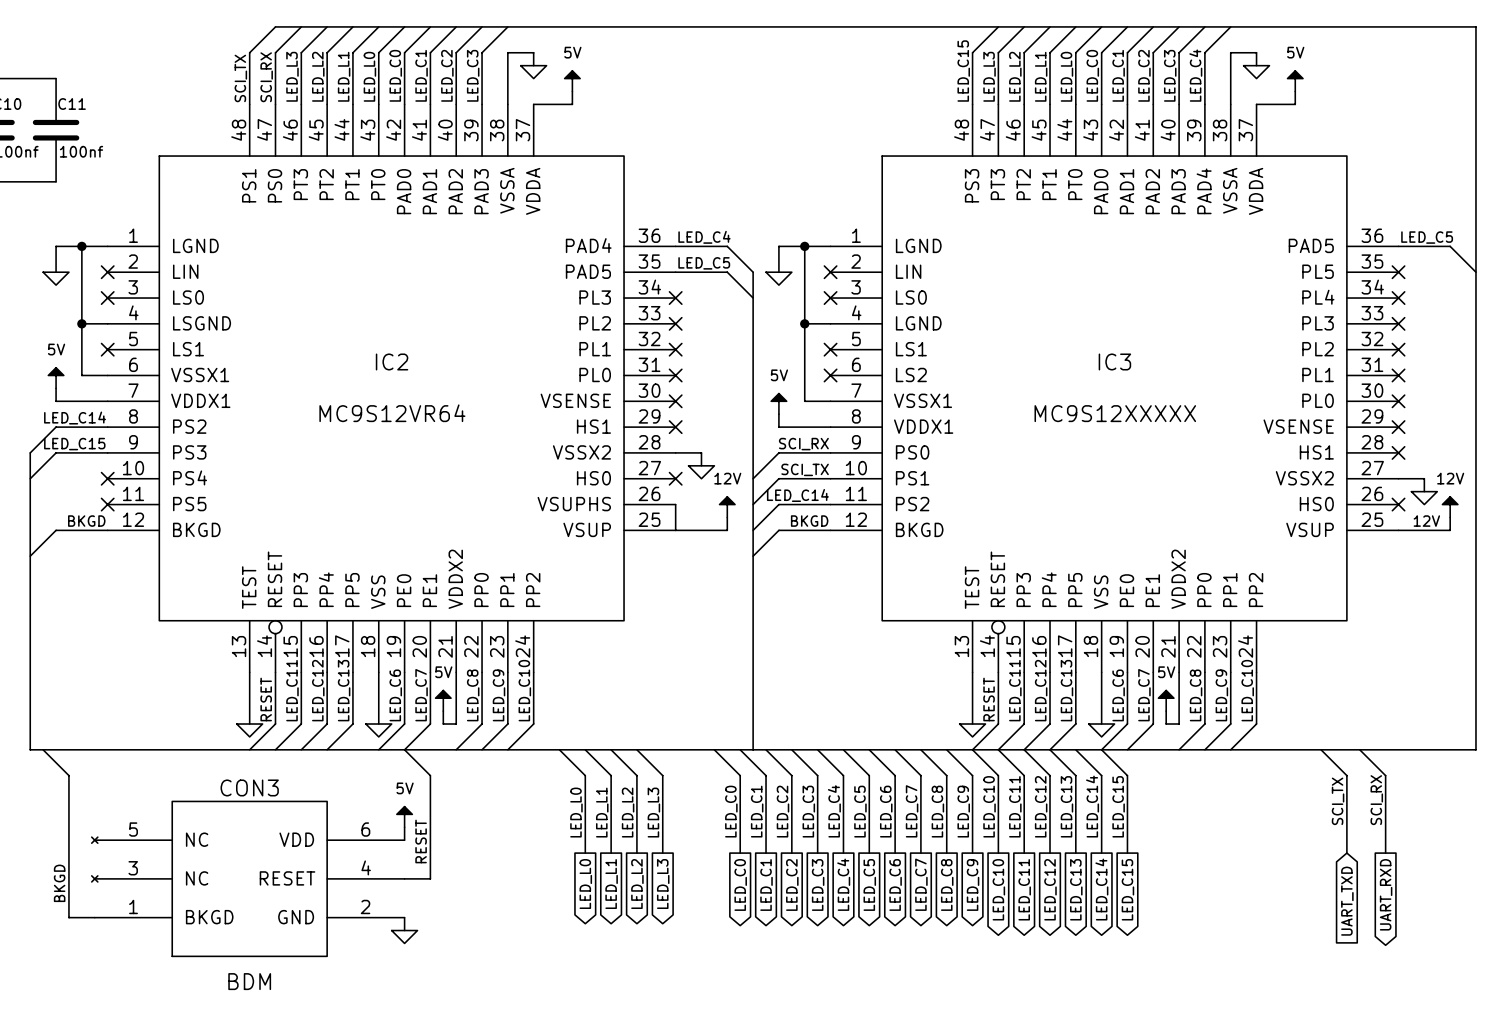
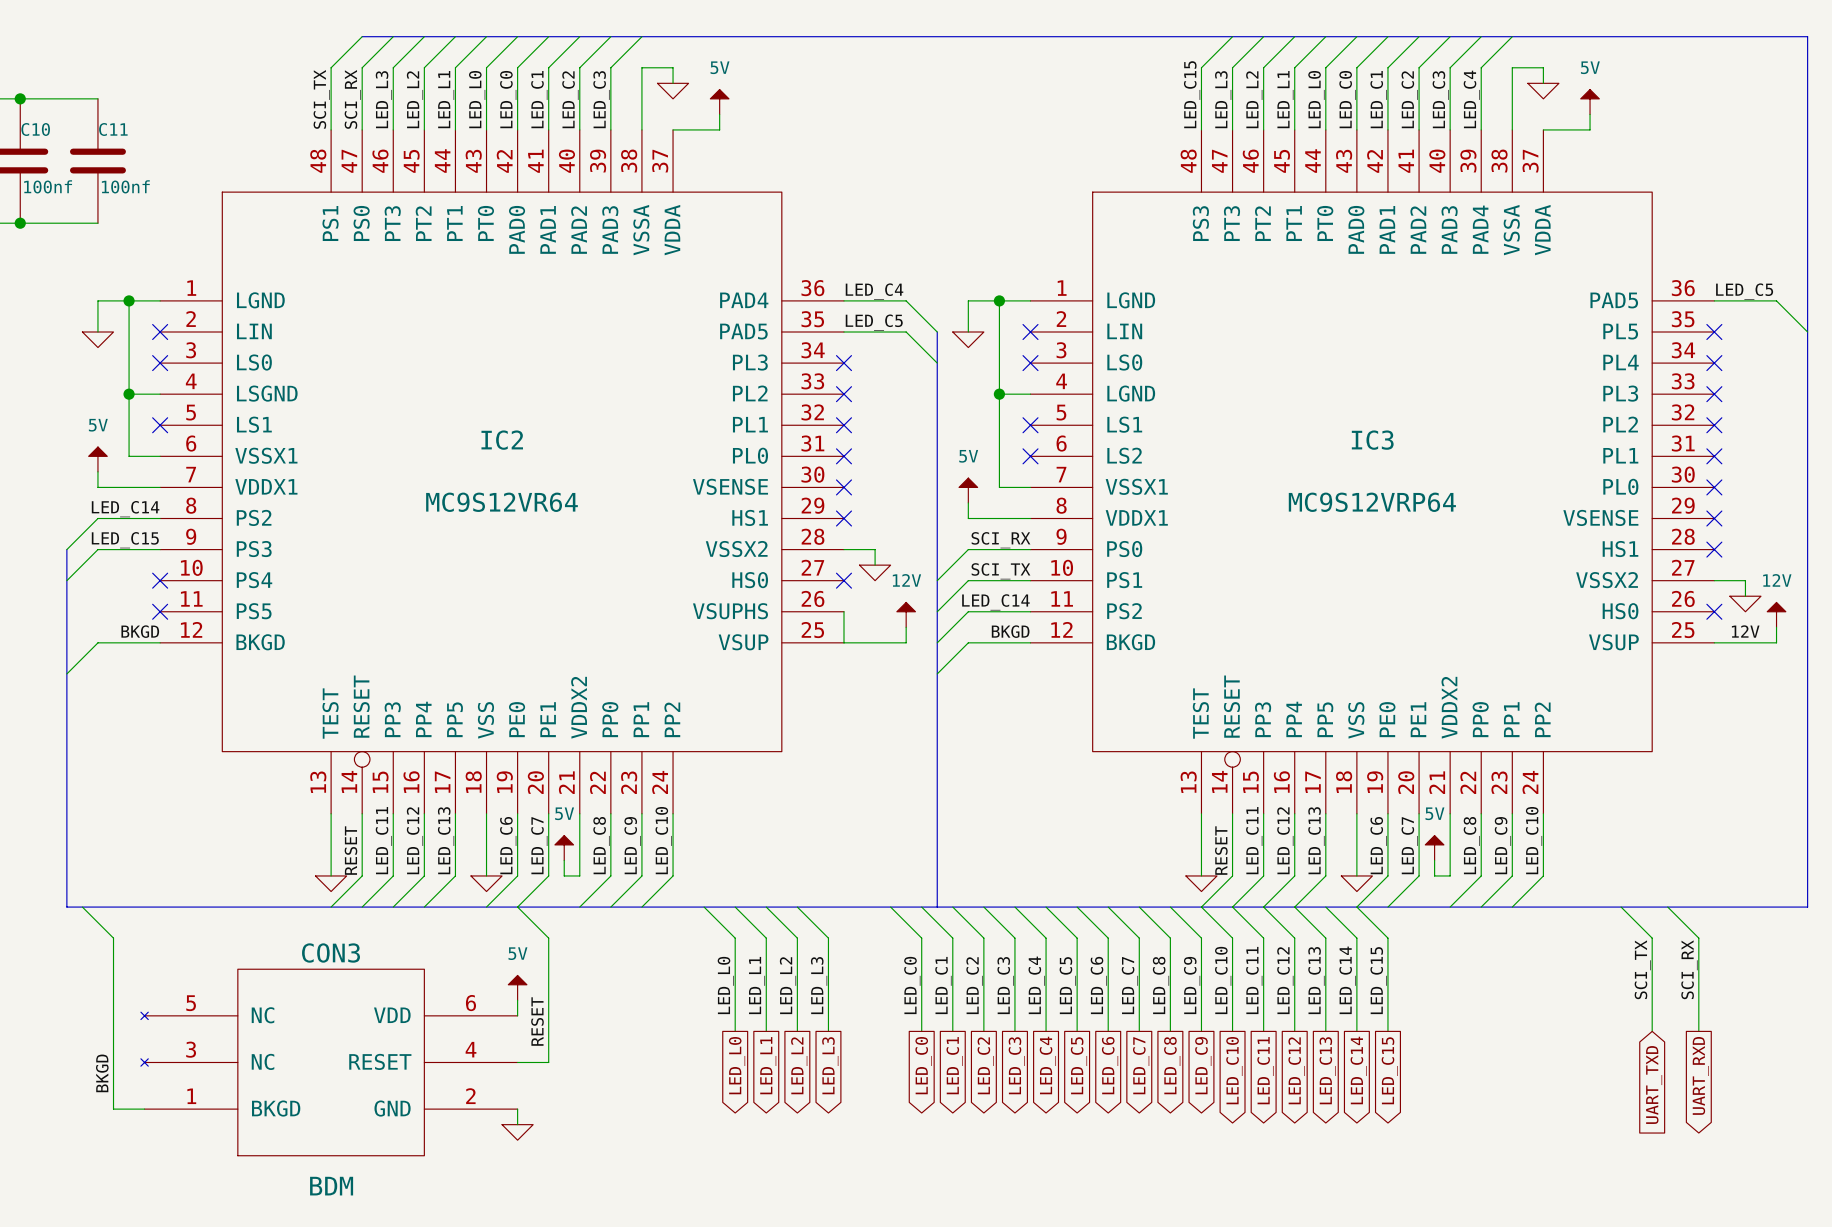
IC3 value: MC9S12XXXXX (1115, 413) -> MC9S12VRP64 (1372, 502)

